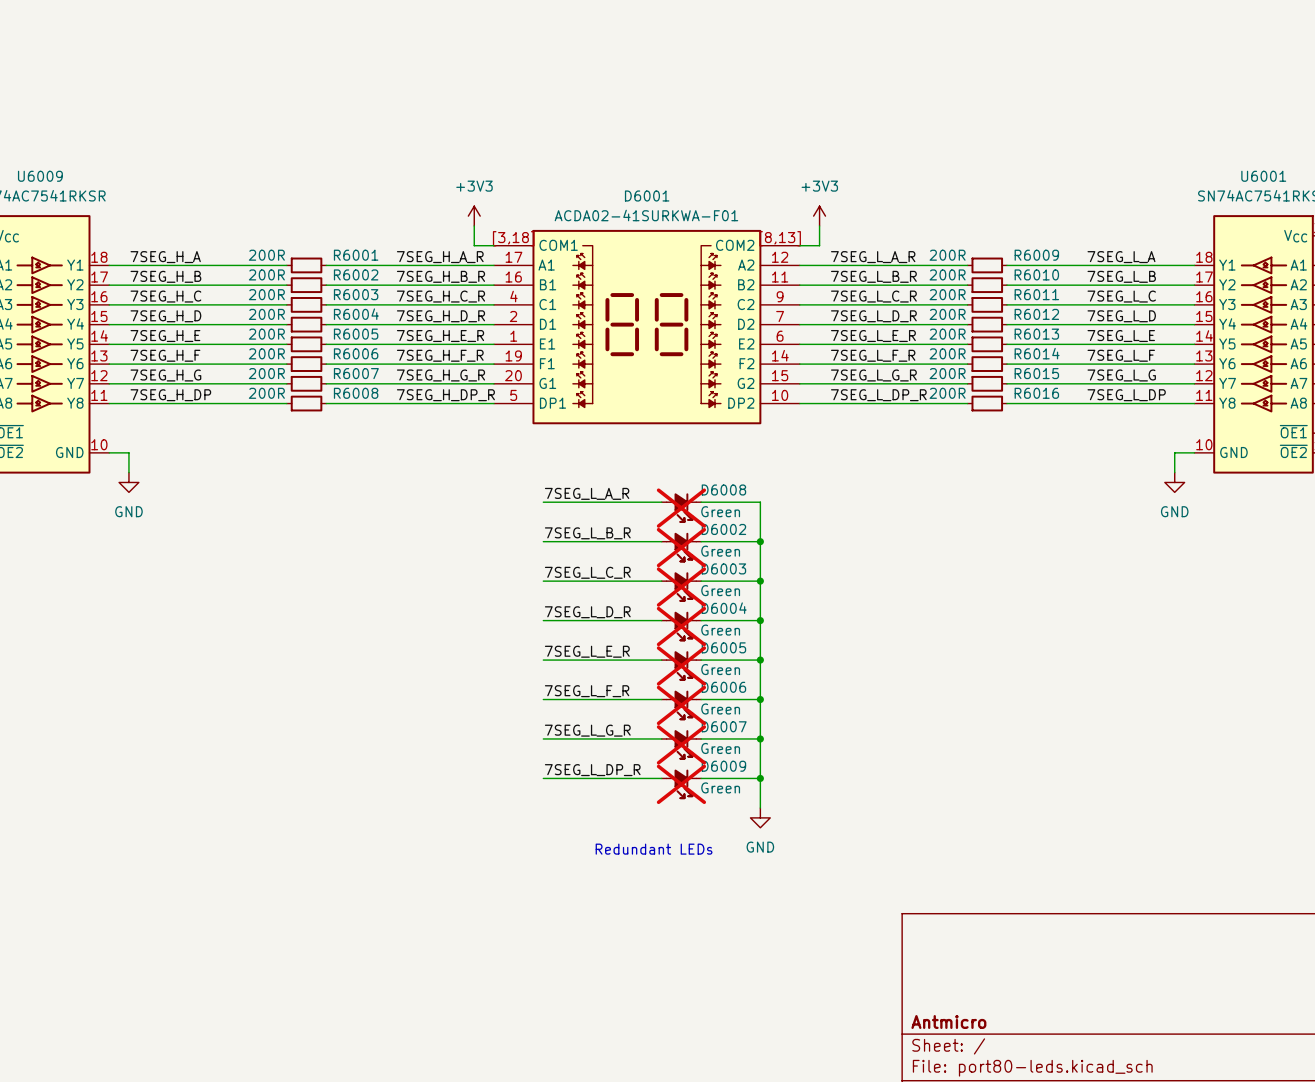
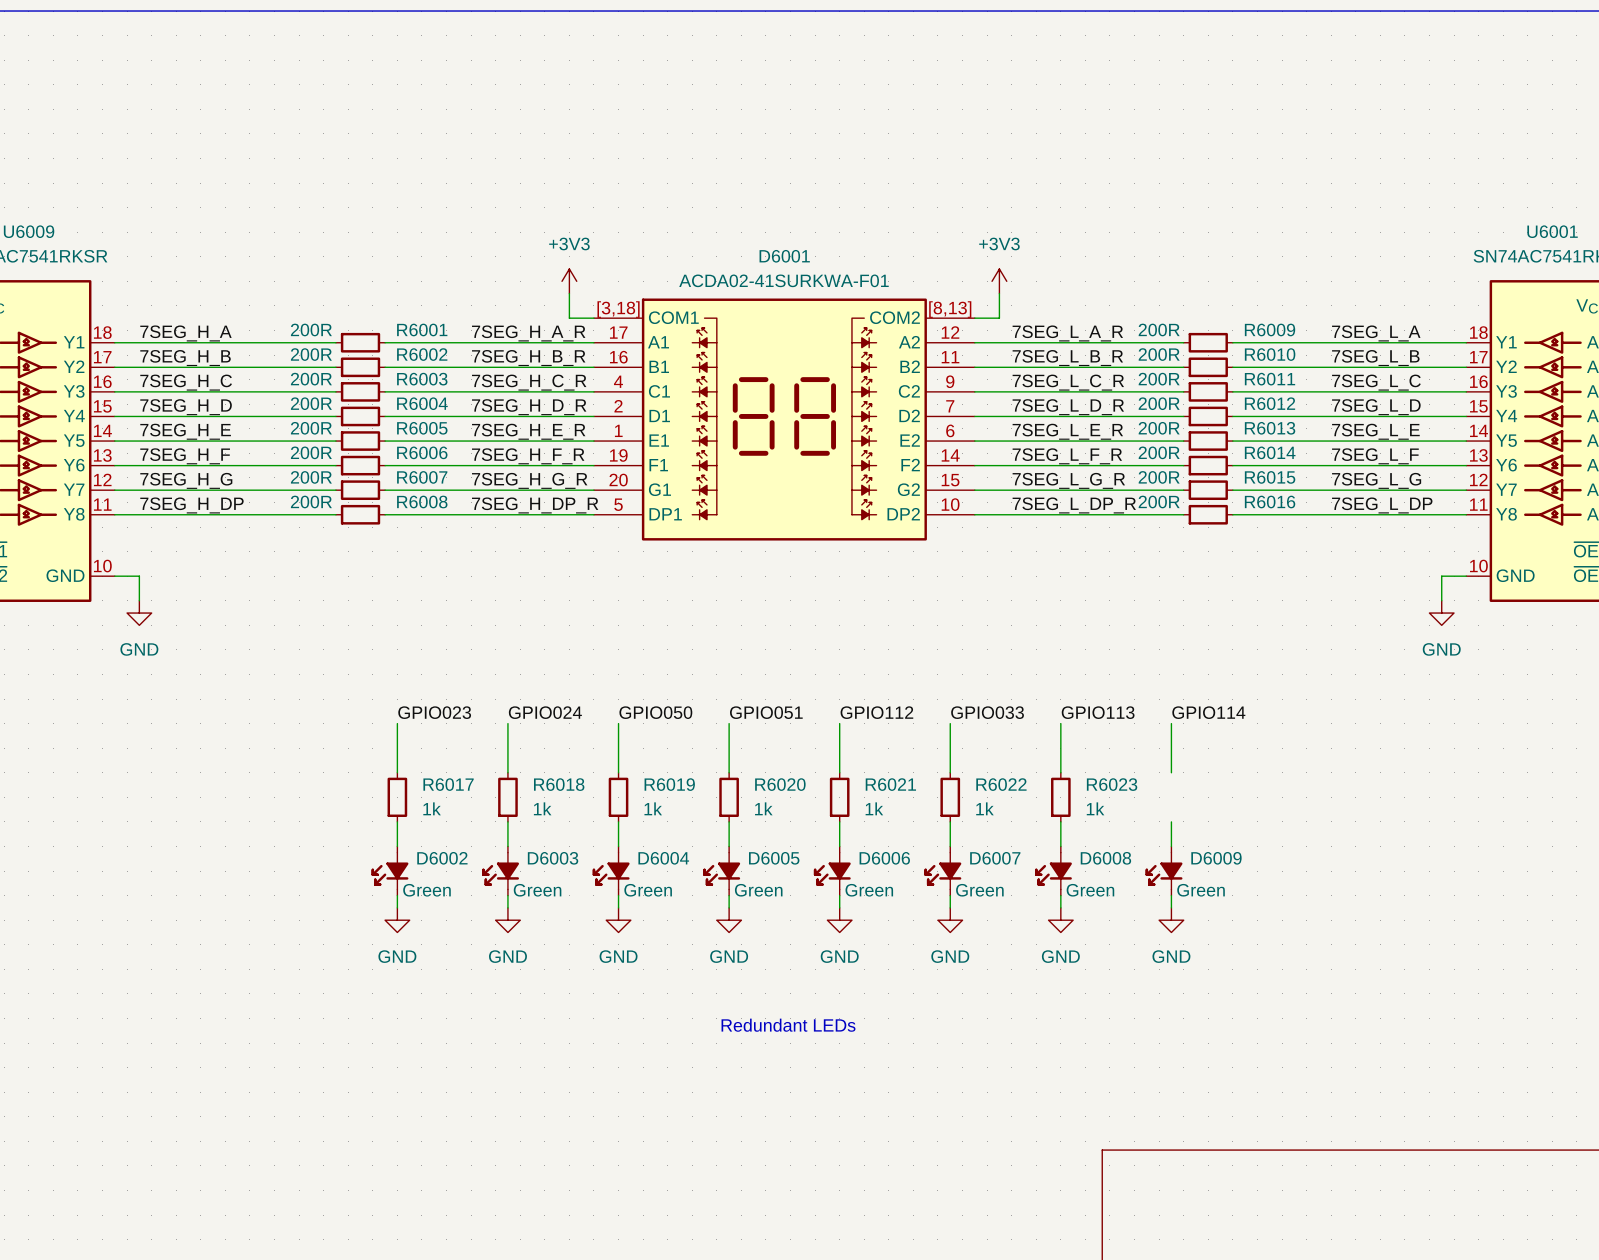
label: 7SEG_L_A_R (587, 493) -> none
wire: (543, 502) (661, 502) -> none
wire: (701, 502) (760, 502) (760, 808) -> none
D6008 rotation: 0° (681, 508) -> 90° clockwise (1053, 871)
D6008 position: (681, 508) -> (1053, 871)
D6008 do-not-place cross: (681, 508) -> none
label: 7SEG_L_B_R (587, 533) -> none
wire: (543, 541) (661, 541) -> none
wire: (701, 541) (760, 541) -> none
junction: (760, 541) -> none
D6002 rotation: 0° (681, 547) -> 90° clockwise (390, 871)
D6002 position: (681, 547) -> (390, 871)
D6002 do-not-place cross: (681, 547) -> none
label: none -> GPIO023 (434, 712)
label: none -> GPIO024 (545, 712)
label: none -> GPIO050 (655, 712)
label: none -> GPIO051 (766, 712)
label: none -> GPIO112 (876, 712)
label: none -> GPIO033 (987, 712)
label: none -> GPIO113 (1098, 712)
label: none -> GPIO114 (1208, 712)
wire: none -> (397, 723) (397, 772)
wire: none -> (507, 723) (507, 772)
wire: none -> (618, 723) (618, 772)
wire: none -> (729, 723) (729, 772)
wire: none -> (839, 723) (839, 772)
wire: none -> (950, 723) (950, 772)
wire: none -> (1060, 723) (1060, 772)
wire: none -> (1171, 723) (1171, 772)
label: 7SEG_L_C_R (587, 572) -> none
wire: (543, 581) (661, 581) -> none
wire: (701, 581) (760, 581) -> none
junction: (760, 581) -> none
D6003 rotation: 0° (681, 587) -> 90° clockwise (500, 871)
D6003 position: (681, 587) -> (500, 871)
D6003 do-not-place cross: (681, 587) -> none
label: 7SEG_L_D_R (587, 612) -> none
wire: (543, 620) (661, 620) -> none
wire: (701, 620) (760, 620) -> none
junction: (760, 620) -> none
D6004 rotation: 0° (681, 626) -> 90° clockwise (611, 871)
D6004 position: (681, 626) -> (611, 871)
D6004 do-not-place cross: (681, 626) -> none
R6017: none -> (397, 797)
R6018: none -> (507, 797)
R6019: none -> (618, 797)
R6020: none -> (729, 797)
R6021: none -> (839, 797)
R6022: none -> (950, 797)
R6023: none -> (1060, 797)
wire: none -> (397, 821) (397, 846)
wire: none -> (507, 821) (507, 846)
wire: none -> (618, 821) (618, 846)
wire: none -> (729, 821) (729, 846)
wire: none -> (839, 821) (839, 846)
wire: none -> (950, 821) (950, 846)
wire: none -> (1060, 821) (1060, 846)
wire: none -> (1171, 821) (1171, 846)
label: 7SEG_L_E_R (587, 651) -> none
wire: (543, 660) (661, 660) -> none
wire: (701, 660) (760, 660) -> none
junction: (760, 660) -> none
D6005 rotation: 0° (681, 665) -> 90° clockwise (721, 871)
D6005 position: (681, 665) -> (721, 871)
D6005 do-not-place cross: (681, 665) -> none
label: 7SEG_L_F_R (587, 691) -> none
wire: (543, 699) (661, 699) -> none
wire: (701, 699) (760, 699) -> none
junction: (760, 699) -> none
D6006 rotation: 0° (681, 705) -> 90° clockwise (832, 871)
D6006 do-not-place cross: (681, 705) -> none
wire: none -> (397, 895) (397, 907)
wire: none -> (507, 895) (507, 907)
wire: none -> (618, 895) (618, 907)
wire: none -> (729, 895) (729, 907)
wire: none -> (950, 895) (950, 907)
wire: none -> (1060, 895) (1060, 907)
wire: none -> (1171, 895) (1171, 907)
power symbol: none -> GND (397, 920)
power symbol: none -> GND (507, 920)
power symbol: none -> GND (618, 920)
power symbol: none -> GND (729, 920)
power symbol: none -> GND (839, 920)
power symbol: none -> GND (950, 920)
power symbol: none -> GND (1060, 920)
power symbol: none -> GND (1171, 920)
label: 7SEG_L_G_R (587, 730) -> none
wire: (543, 738) (661, 738) -> none
wire: (701, 738) (760, 738) -> none
junction: (760, 738) -> none
D6007 rotation: 0° (681, 744) -> 90° clockwise (942, 871)
D6007 position: (681, 744) -> (942, 871)
D6007 do-not-place cross: (681, 744) -> none
label: 7SEG_L_DP_R (592, 770) -> none
wire: (543, 778) (661, 778) -> none
wire: (701, 778) (760, 778) -> none
junction: (760, 778) -> none
D6009 rotation: 0° (681, 784) -> 90° clockwise (1164, 871)
D6009 position: (681, 784) -> (1164, 871)
D6009 do-not-place cross: (681, 784) -> none
power symbol: GND (760, 817) -> none
text position: Redundant LEDs (654, 849) -> Redundant LEDs (788, 1025)

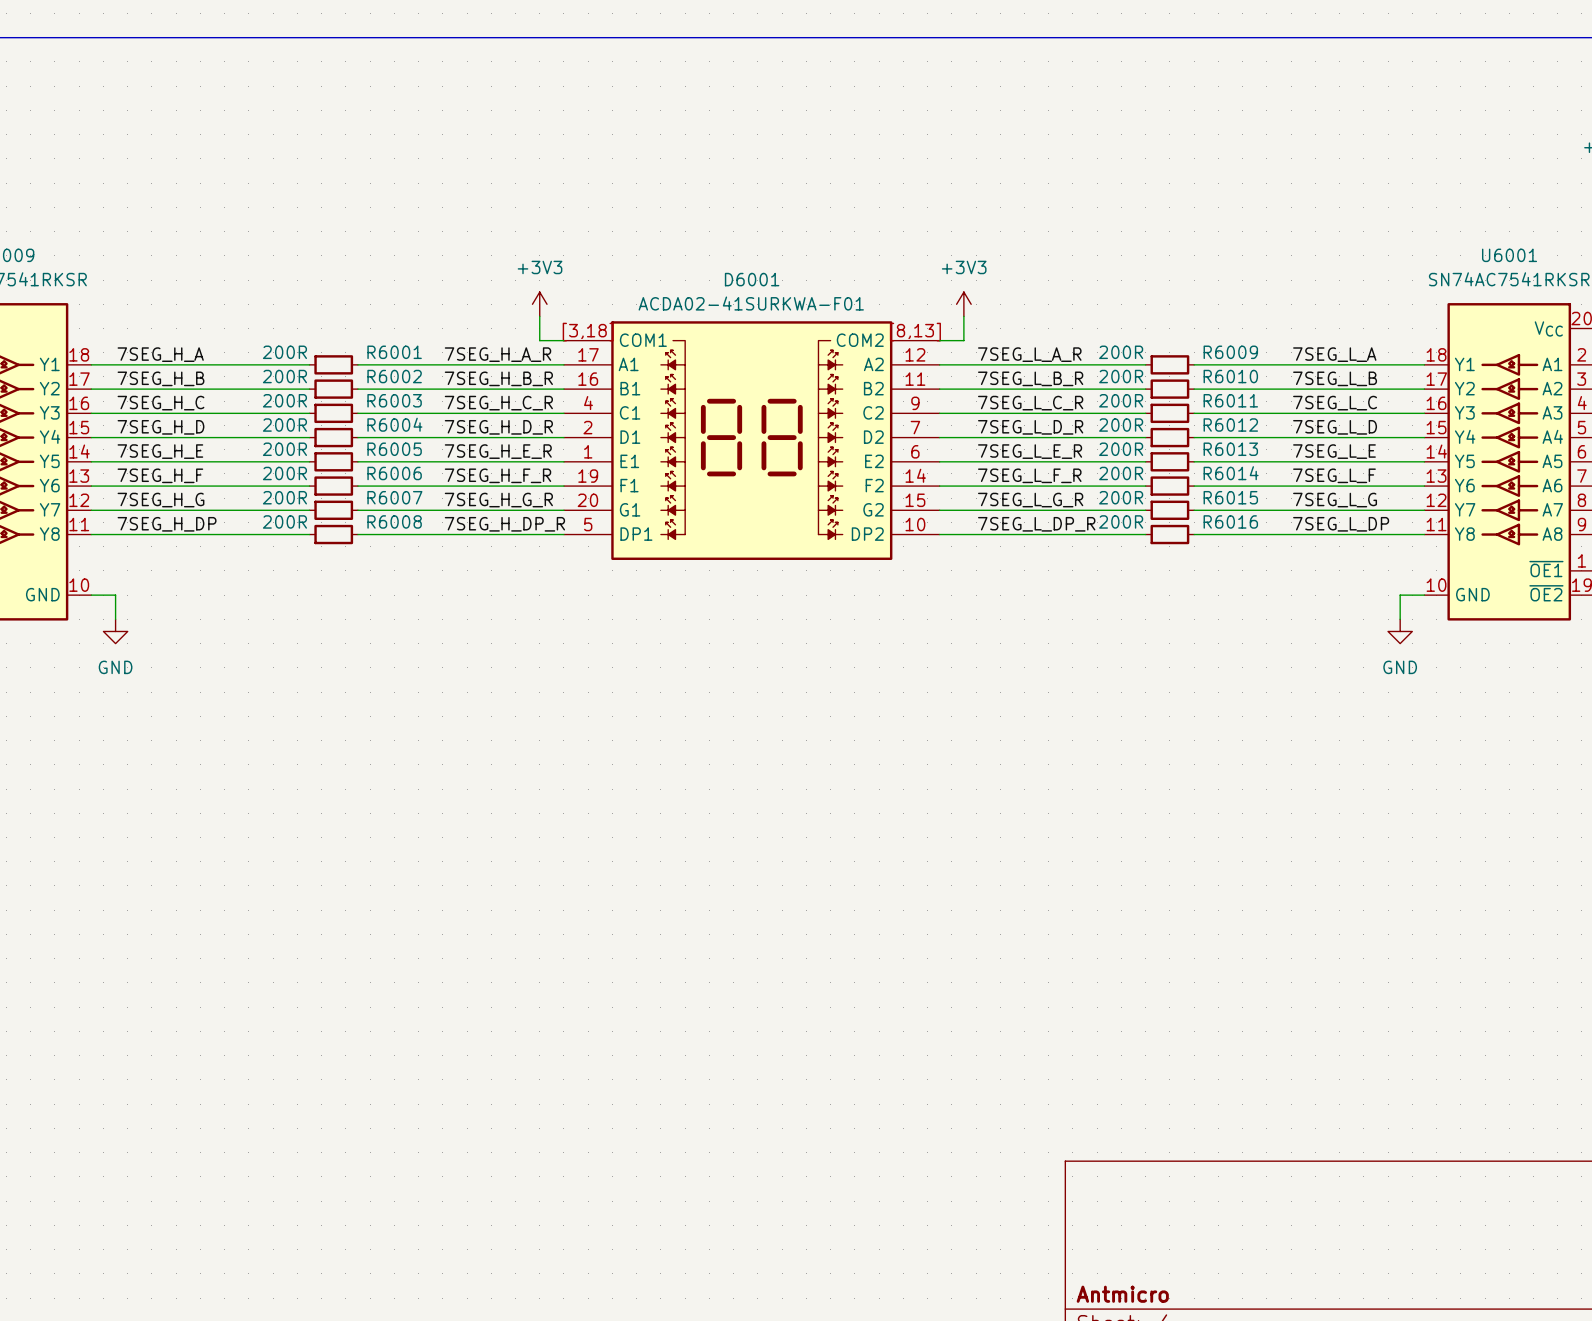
label: GPIO023 (434, 712) -> none
label: GPIO024 (545, 712) -> none
label: GPIO050 (655, 712) -> none
label: GPIO051 (766, 712) -> none
label: GPIO112 (876, 712) -> none
label: GPIO033 (987, 712) -> none
label: GPIO113 (1098, 712) -> none
label: GPIO114 (1208, 712) -> none
wire: (397, 723) (397, 772) -> none
wire: (507, 723) (507, 772) -> none
wire: (618, 723) (618, 772) -> none
wire: (729, 723) (729, 772) -> none
wire: (839, 723) (839, 772) -> none
wire: (950, 723) (950, 772) -> none
wire: (1060, 723) (1060, 772) -> none
wire: (1171, 723) (1171, 772) -> none
R6017: (397, 797) -> none
R6018: (507, 797) -> none
R6019: (618, 797) -> none
R6020: (729, 797) -> none
R6021: (839, 797) -> none
R6022: (950, 797) -> none
R6023: (1060, 797) -> none
wire: (397, 821) (397, 846) -> none
wire: (507, 821) (507, 846) -> none
wire: (618, 821) (618, 846) -> none
wire: (729, 821) (729, 846) -> none
wire: (839, 821) (839, 846) -> none
wire: (950, 821) (950, 846) -> none
wire: (1060, 821) (1060, 846) -> none
wire: (1171, 821) (1171, 846) -> none
D6002: (390, 871) -> none
D6003: (500, 871) -> none
D6004: (611, 871) -> none
D6005: (721, 871) -> none
D6006: (832, 871) -> none
D6007: (942, 871) -> none
D6008: (1053, 871) -> none
D6009: (1164, 871) -> none
wire: (397, 895) (397, 907) -> none
wire: (507, 895) (507, 907) -> none
wire: (618, 895) (618, 907) -> none
wire: (729, 895) (729, 907) -> none
wire: (839, 895) (839, 907) -> none
wire: (950, 895) (950, 907) -> none
wire: (1060, 895) (1060, 907) -> none
wire: (1171, 895) (1171, 907) -> none
power symbol: GND (397, 920) -> none
power symbol: GND (507, 920) -> none
power symbol: GND (618, 920) -> none
power symbol: GND (729, 920) -> none
power symbol: GND (839, 920) -> none
power symbol: GND (950, 920) -> none
power symbol: GND (1060, 920) -> none
power symbol: GND (1171, 920) -> none
text: Redundant LEDs (788, 1025) -> none

